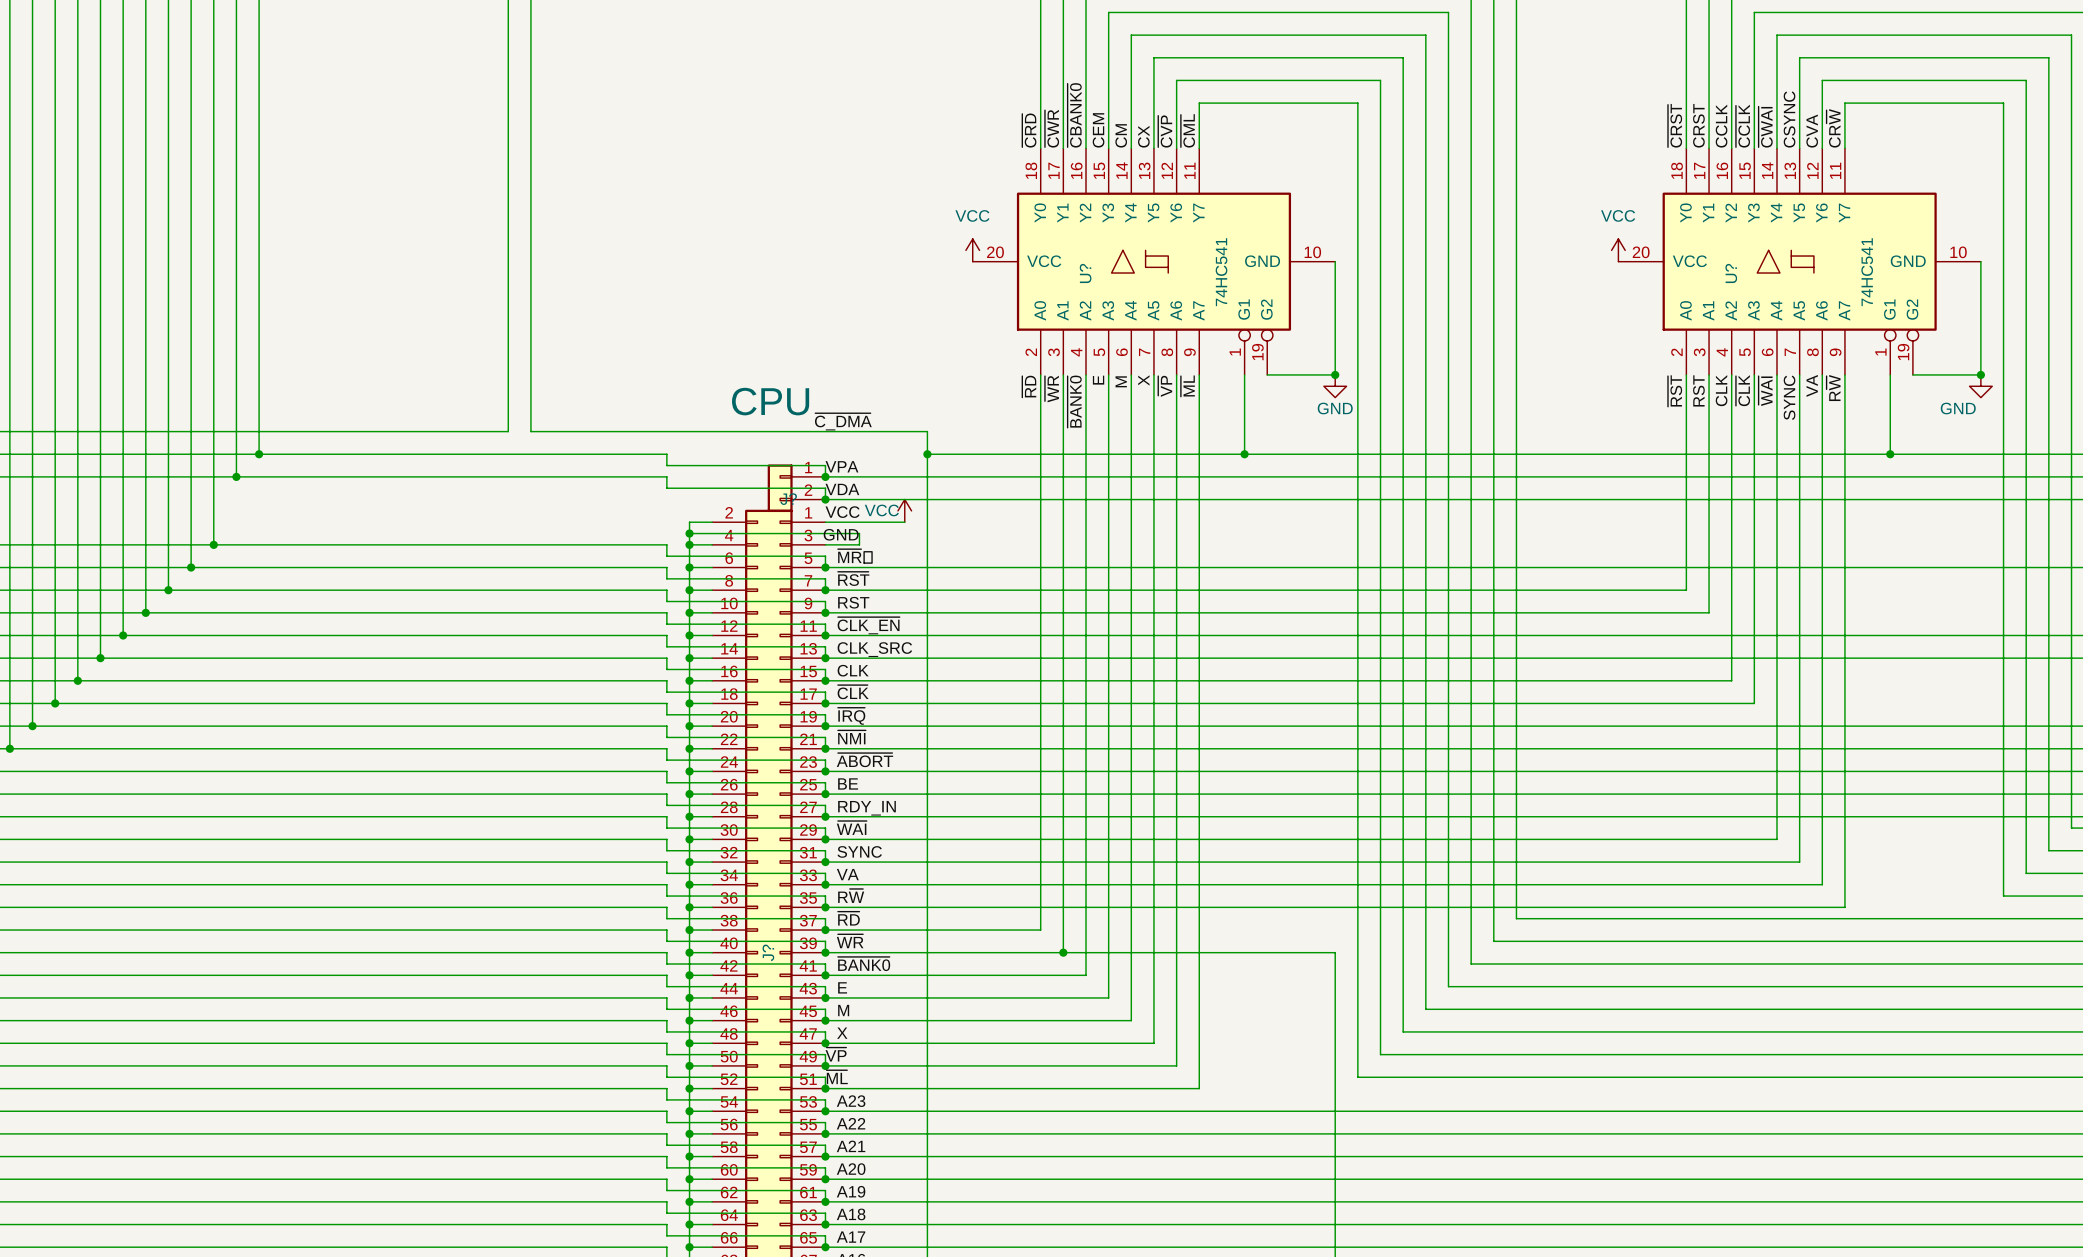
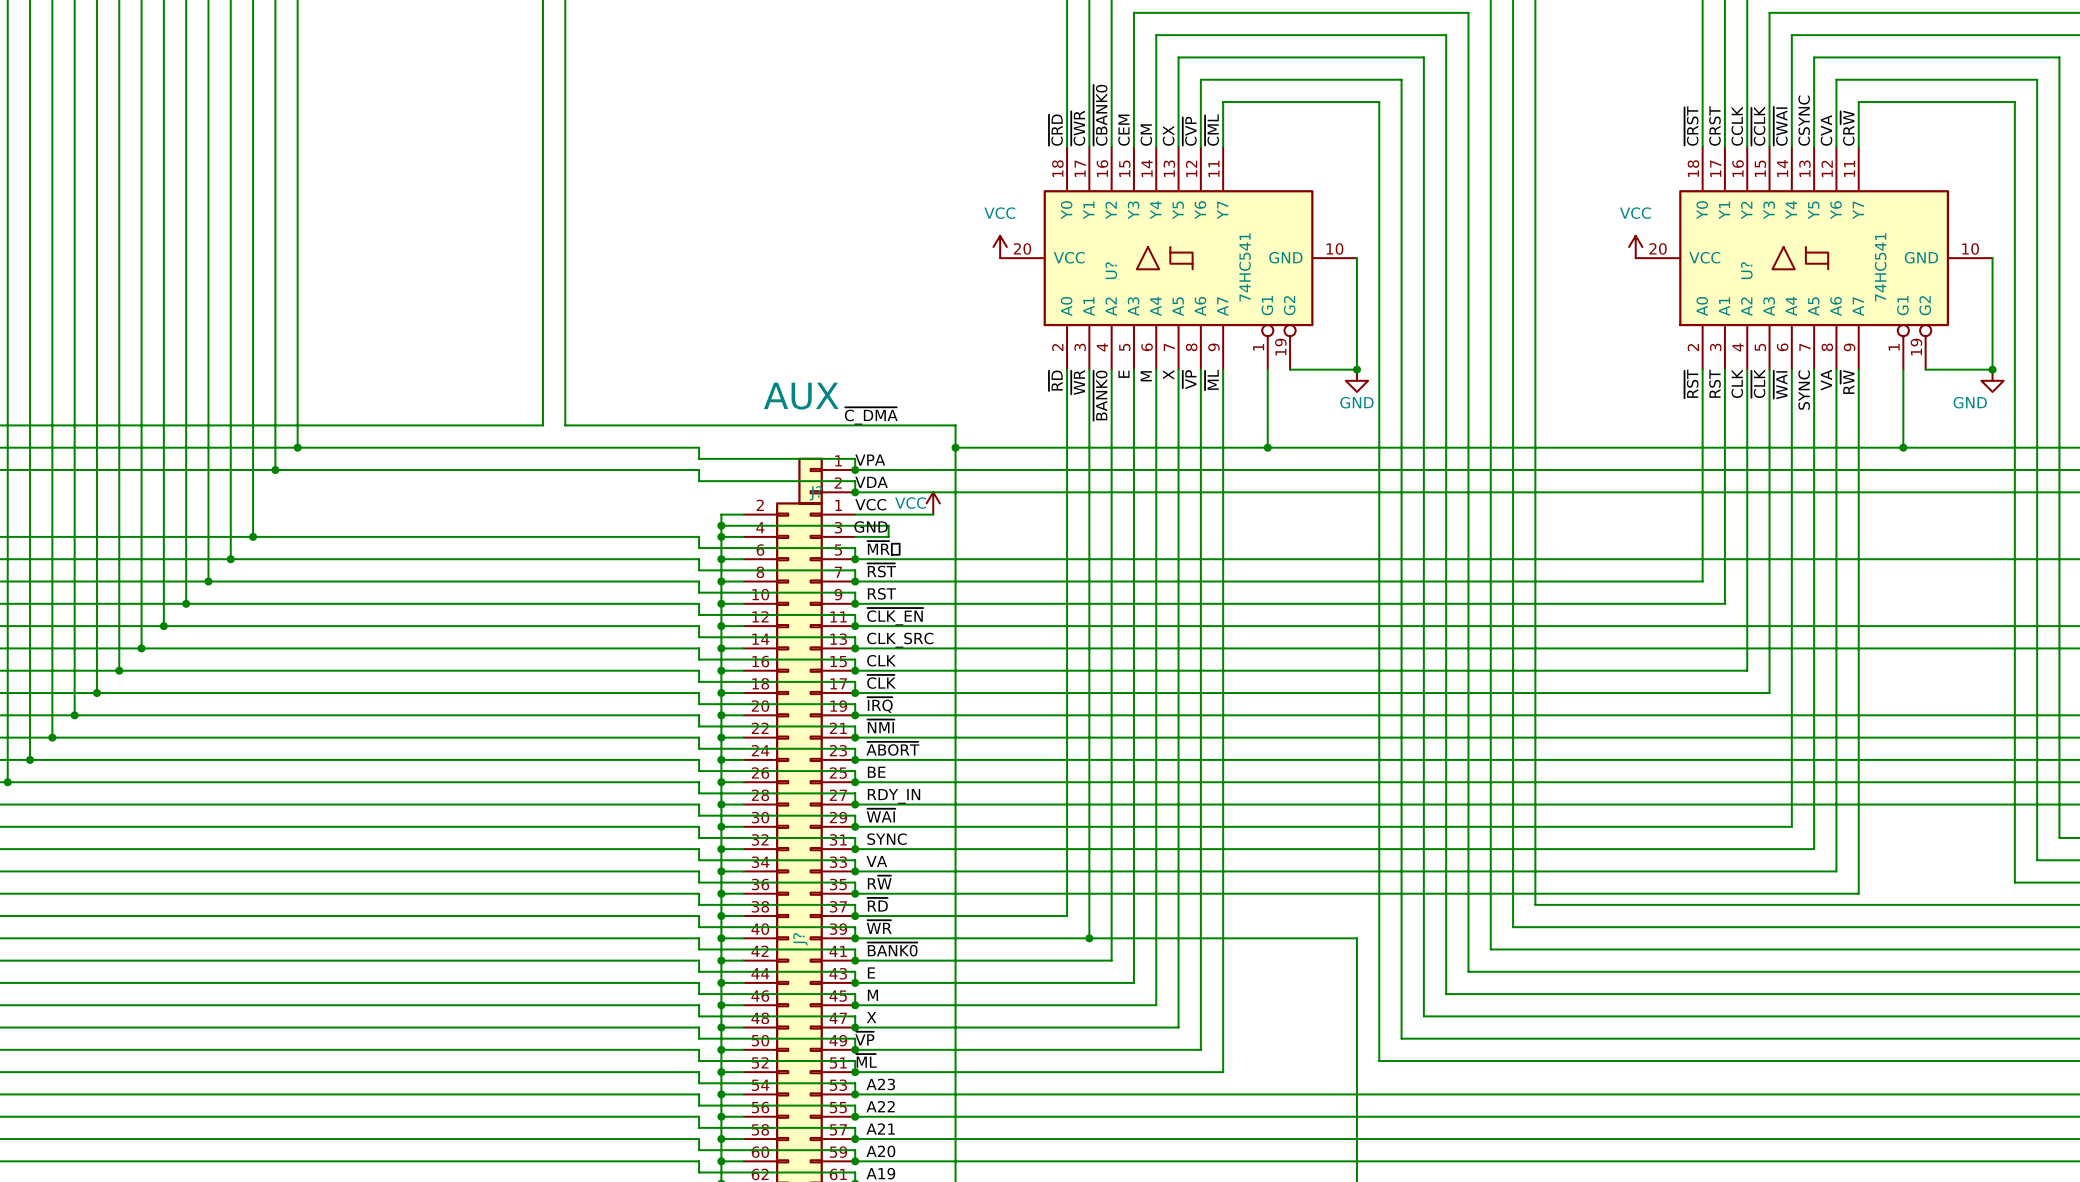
part value: CPU (770, 401) -> AUX (801, 396)

